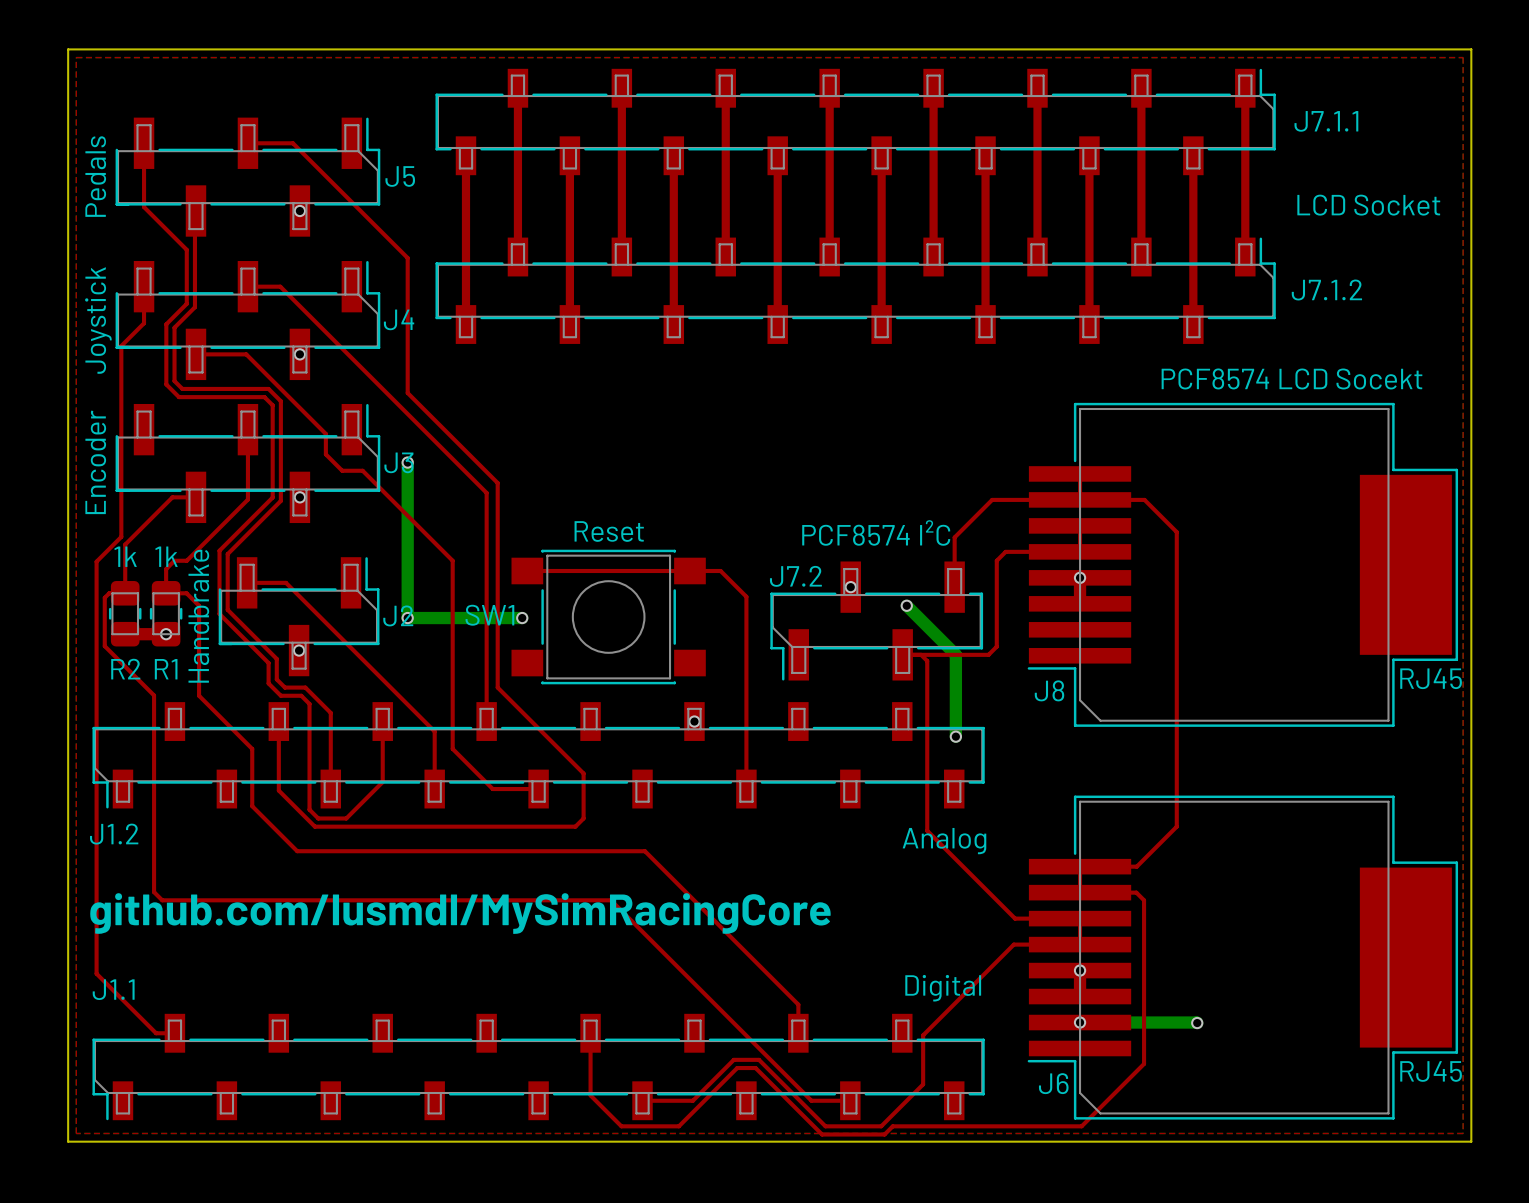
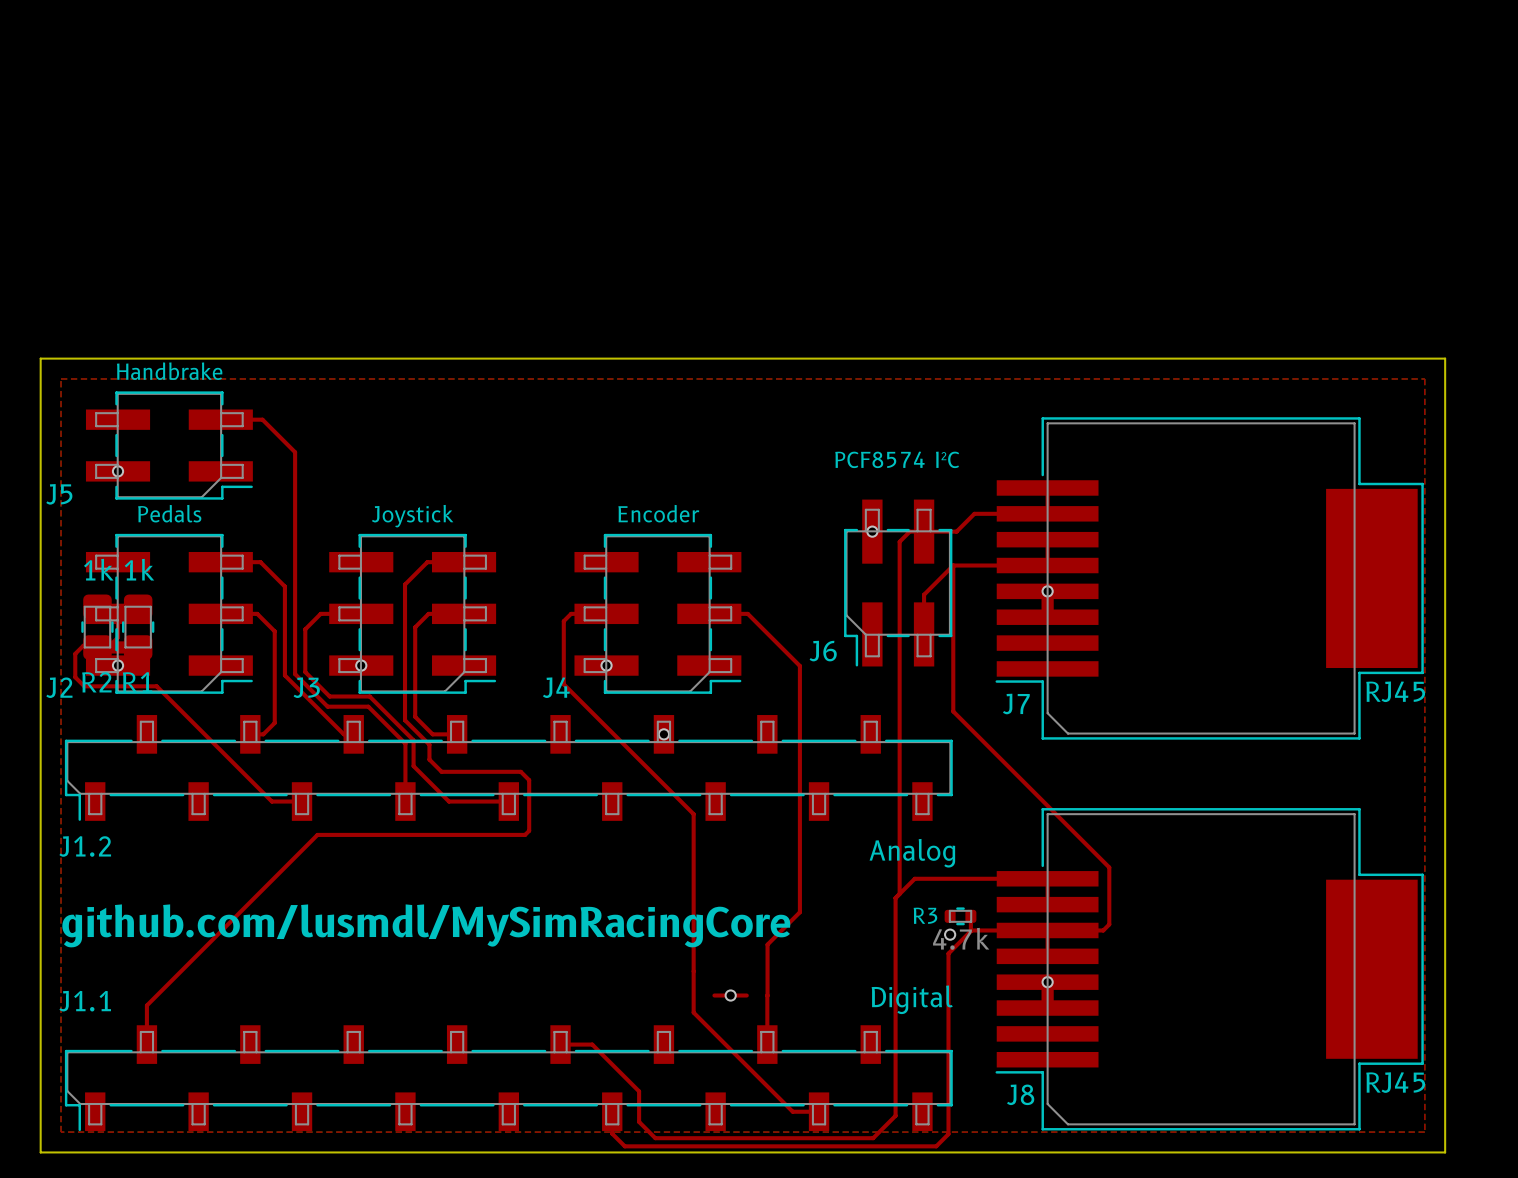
top zone outline: (76, 57) (1463, 57) (1463, 1133) (76, 1133) (76, 57) -> (61, 378) (61, 1132) (1424, 1132) (1424, 378) (61, 378)
top track: (517, 88) (517, 257) -> none
top track: (621, 88) (621, 257) -> none
top track: (725, 88) (725, 257) -> none
top track: (829, 88) (829, 257) -> none
top track: (933, 88) (933, 257) -> none
top track: (1037, 88) (1037, 257) -> none
top track: (1141, 88) (1141, 257) -> none
top track: (1245, 88) (1245, 257) -> none
J5 footprint: [115, 117, 381, 237] -> [85, 391, 253, 500]
J7.1.1: LCD Socket (855, 122) -> none
top track: (144, 143) (144, 207) (186, 249) (186, 303) (166, 324) (166, 384) (179, 397) (264, 397) (272, 405) (272, 497) (219, 550) (219, 613) (268, 663) (268, 683) (280, 695) (301, 695) (309, 703) (309, 809) (318, 818) (346, 818) (382, 782) (382, 721) -> (220, 562) (260, 562) (284, 586) (284, 675) (343, 734) (353, 734)
top track: (247, 143) (292, 143) (407, 258) (407, 393) (497, 483) (497, 687) (583, 773) (583, 818) (575, 826) (314, 826) (278, 790) (278, 721) -> (220, 613) (257, 613) (274, 631) (274, 722) (263, 734) (250, 734)
top track: (465, 155) (465, 324) -> none
top track: (569, 155) (569, 324) -> none
top track: (673, 155) (673, 324) -> none
top track: (777, 155) (777, 324) -> none
top track: (881, 155) (881, 324) -> none
top track: (985, 155) (985, 324) -> none
top track: (1089, 155) (1089, 324) -> none
top track: (1193, 155) (1193, 324) -> none
J5 value: Pedals (95, 176) -> Handbrake (169, 371)
J5 name position: J5 (400, 176) -> J5 (59, 494)
top track: (195, 210) (194, 307) (174, 327) (174, 381) (182, 388) (268, 388) (280, 401) (280, 500) (227, 554) (227, 609) (276, 658) (276, 679) (284, 687) (305, 687) (330, 712) (330, 789) -> (118, 613) (118, 637) (109, 645) (83, 645) (75, 653) (75, 677) (84, 686) (156, 686) (271, 801) (302, 801)
via: (299, 210) -> none
J4 footprint: [115, 261, 381, 381] -> [574, 533, 742, 694]
top track: (144, 286) (144, 323) (121, 345) (121, 536) (96, 561) (96, 973) (156, 1033) (174, 1033) -> (464, 562) (427, 562) (405, 584) (405, 720) (429, 744) (429, 759) (441, 771) (520, 771) (529, 780) (529, 830) (525, 834) (317, 834) (146, 1005) (146, 1044)
top track: (247, 286) (280, 286) (486, 492) (486, 721) -> (464, 613) (428, 613) (415, 627) (415, 716) (432, 734) (457, 734)
J7.1.2: PCF8574 LCD Socekt (855, 290) -> none
J4 name position: J4 (399, 319) -> J4 (556, 687)
J4 value: Joystick (98, 320) -> Encoder (658, 513)
board edge: (68, 343) (68, 49) (1471, 49) (1471, 1141) -> (40, 358) (1445, 358) (1445, 1152) (1437, 1152)
top track: (195, 354) (246, 354) (325, 433) (325, 454) (342, 470) (362, 470) (452, 560) (452, 748) (492, 789) -> (361, 613) (320, 613) (305, 629) (305, 672) (329, 696) (369, 696) (413, 740) (413, 766) (448, 801) (463, 801)
via: (299, 354) -> none
J3 footprint: [115, 403, 381, 524] -> [329, 533, 497, 694]
top track: (247, 429) (247, 499) (186, 560) (174, 560) (166, 569) (166, 593) (186, 593) (199, 605) (199, 695) (252, 748) (252, 806) (297, 851) (644, 851) (798, 1004) -> (767, 995) (767, 1016)
via: none -> (118, 471)
J3 value: Encoder (95, 462) -> Joystick (412, 516)
J3 name position: J3 (398, 462) -> J3 (306, 687)
bottom track: (407, 462) (407, 618) (522, 618) -> none
via: (407, 462) -> none
top track: (195, 497) (172, 497) (125, 544) (125, 593) (109, 593) (104, 597) (104, 646) (154, 695) (154, 892) (162, 900) (611, 900) (811, 1100) (823, 1100) -> (606, 613) (571, 613) (563, 621) (563, 684) (693, 814) (693, 1012) (792, 1111)
via: (299, 497) -> none
top track: (1006, 499) (992, 499) (954, 537) (954, 587) -> (974, 513) (956, 531) (909, 531) (899, 541) (899, 893)
top track: (1080, 499) (1144, 499) (1176, 532) (1176, 826) (1136, 866) (1080, 866) -> none
via: none -> (872, 531)
top track: none -> (953, 565) (924, 594) (924, 634)
top track: none -> (953, 565) (953, 711) (1109, 867) (1109, 924) (1103, 930) (1047, 930)
top track: (1005, 551) (996, 560) (996, 646) (988, 654) (902, 654) -> (973, 565) (953, 565)
J2 footprint: [218, 557, 380, 677] -> [85, 533, 253, 694]
J6: none -> PCF8574 I²C (898, 583)
top track: (527, 570) (720, 570) (746, 596) (746, 789) -> none
top track: (247, 582) (285, 582) (434, 731) -> (220, 419) (262, 419) (295, 452) (295, 674) (327, 706) (368, 706) (405, 744)
via: (850, 587) -> none
top track: none -> (709, 613) (747, 613) (799, 665) (799, 912) (767, 944) (767, 995)
bottom track: (906, 605) (955, 654) (955, 736) -> none
via: (906, 605) -> none
J2 name position: J2 (398, 615) -> J2 (59, 687)
J2 value: Handbrake (198, 616) -> Pedals (169, 513)
SW1: Reset (608, 617) -> none
via position: (407, 618) -> (361, 665)
via: (522, 618) -> none
J7.2: PCF8574 I²C (876, 621) -> none
via position: (166, 634) -> (118, 665)
via: (299, 650) -> none
via: none -> (606, 665)
top track: (921, 654) (927, 660) (927, 830) (1015, 918) -> (970, 930) (983, 930)
J8 name: J8 (1049, 690) -> J7 (1016, 704)
via: (955, 736) -> none
top track: (1080, 892) (1136, 892) (1144, 900) (1144, 1063) (1081, 1126) (892, 1126) (884, 1134) (822, 1134) (755, 1068) (737, 1068) (678, 1126) (621, 1126) (590, 1095) (590, 1033) -> (1047, 878) (914, 878) (895, 898) (895, 1115) (873, 1138) (655, 1138) (639, 1121) (639, 1091) (592, 1044) (560, 1044)
R3: none -> 4.7k (960, 916)
via: none -> (950, 934)
top track: (1080, 944) (1013, 944) (923, 1035) (923, 1084) (881, 1126) (825, 1126) (759, 1059) (733, 1059) (692, 1100) (642, 1100) -> (970, 916) (970, 931) (948, 953) (948, 1134) (936, 1146) (624, 1146) (612, 1133) (612, 1111)
top track: none -> (714, 995) (746, 995)
via: none -> (730, 995)
bottom track: (1080, 1022) (1197, 1023) -> none
via: (1080, 1022) -> none
via: (1197, 1023) -> none
J6 name: J6 (1053, 1083) -> J8 (1020, 1094)

